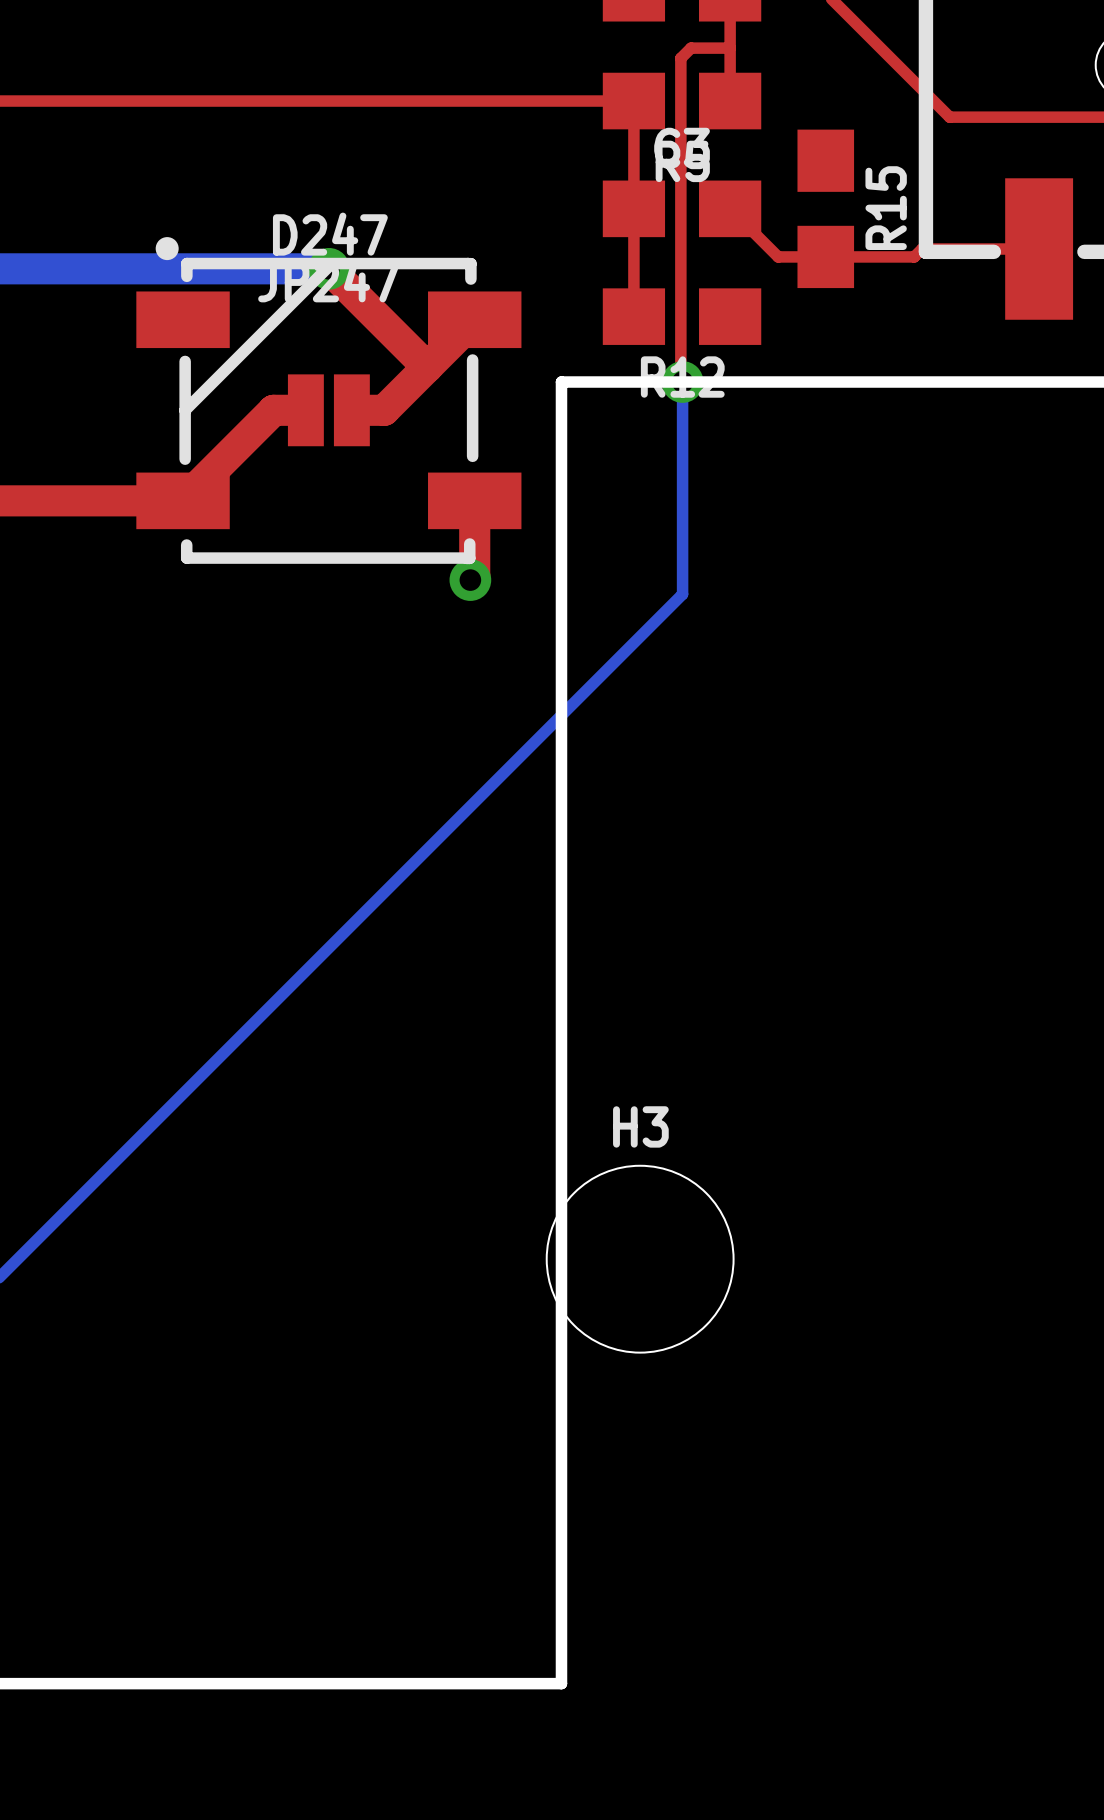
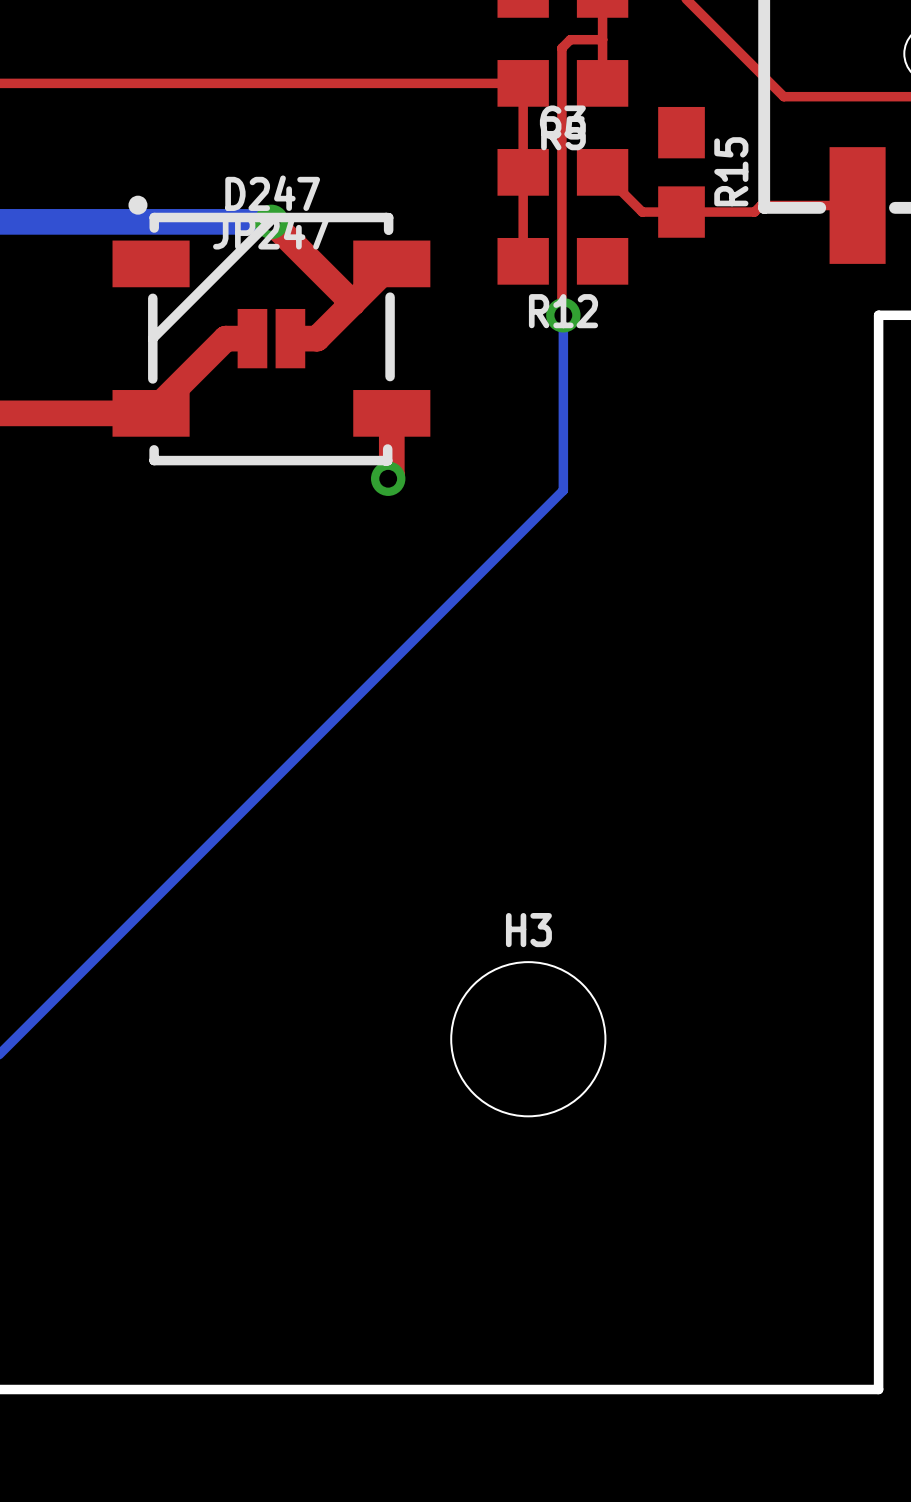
board edge: (1064, 382) (561, 382) (561, 1683) -> (878, 315) (878, 1389) (463, 1389)

